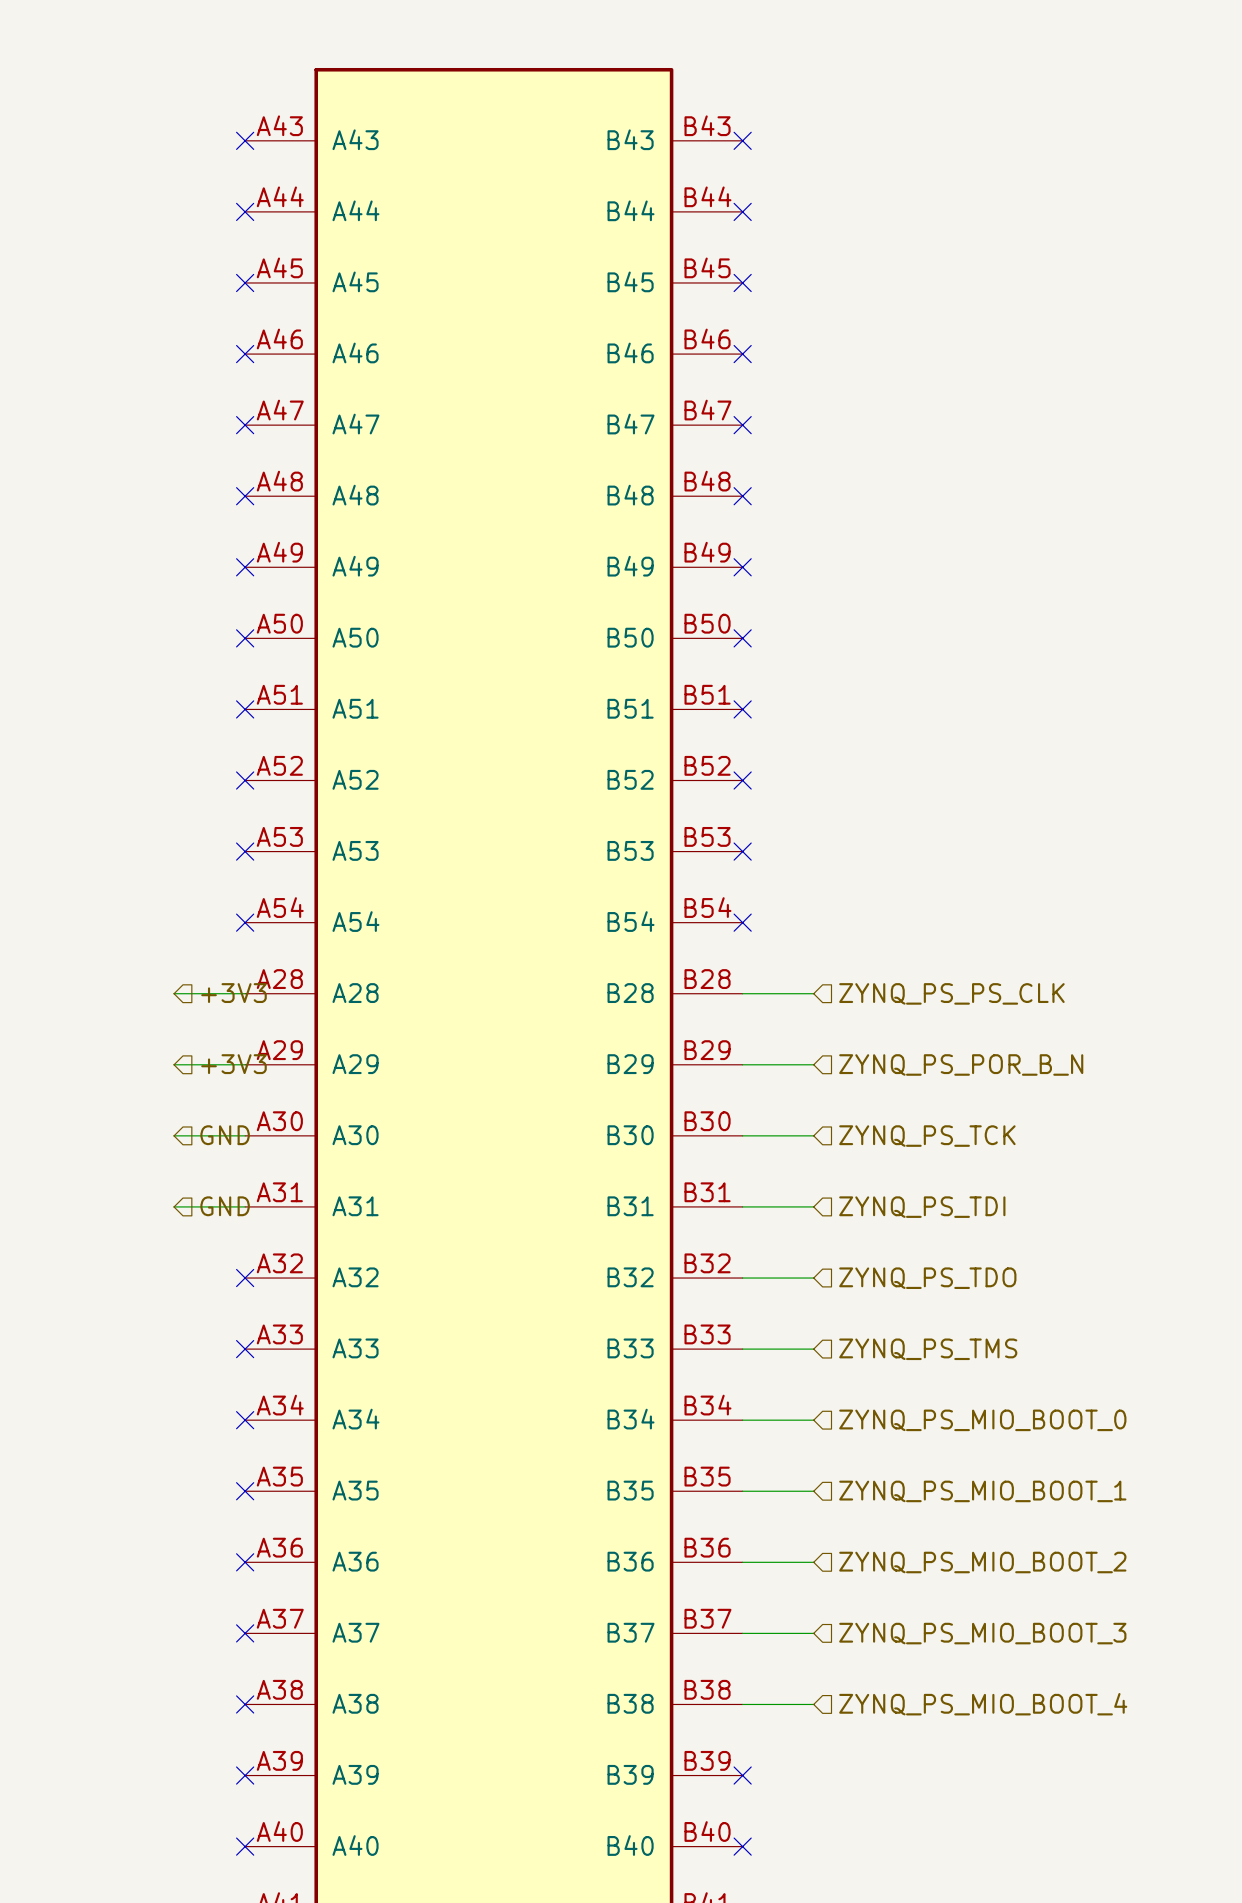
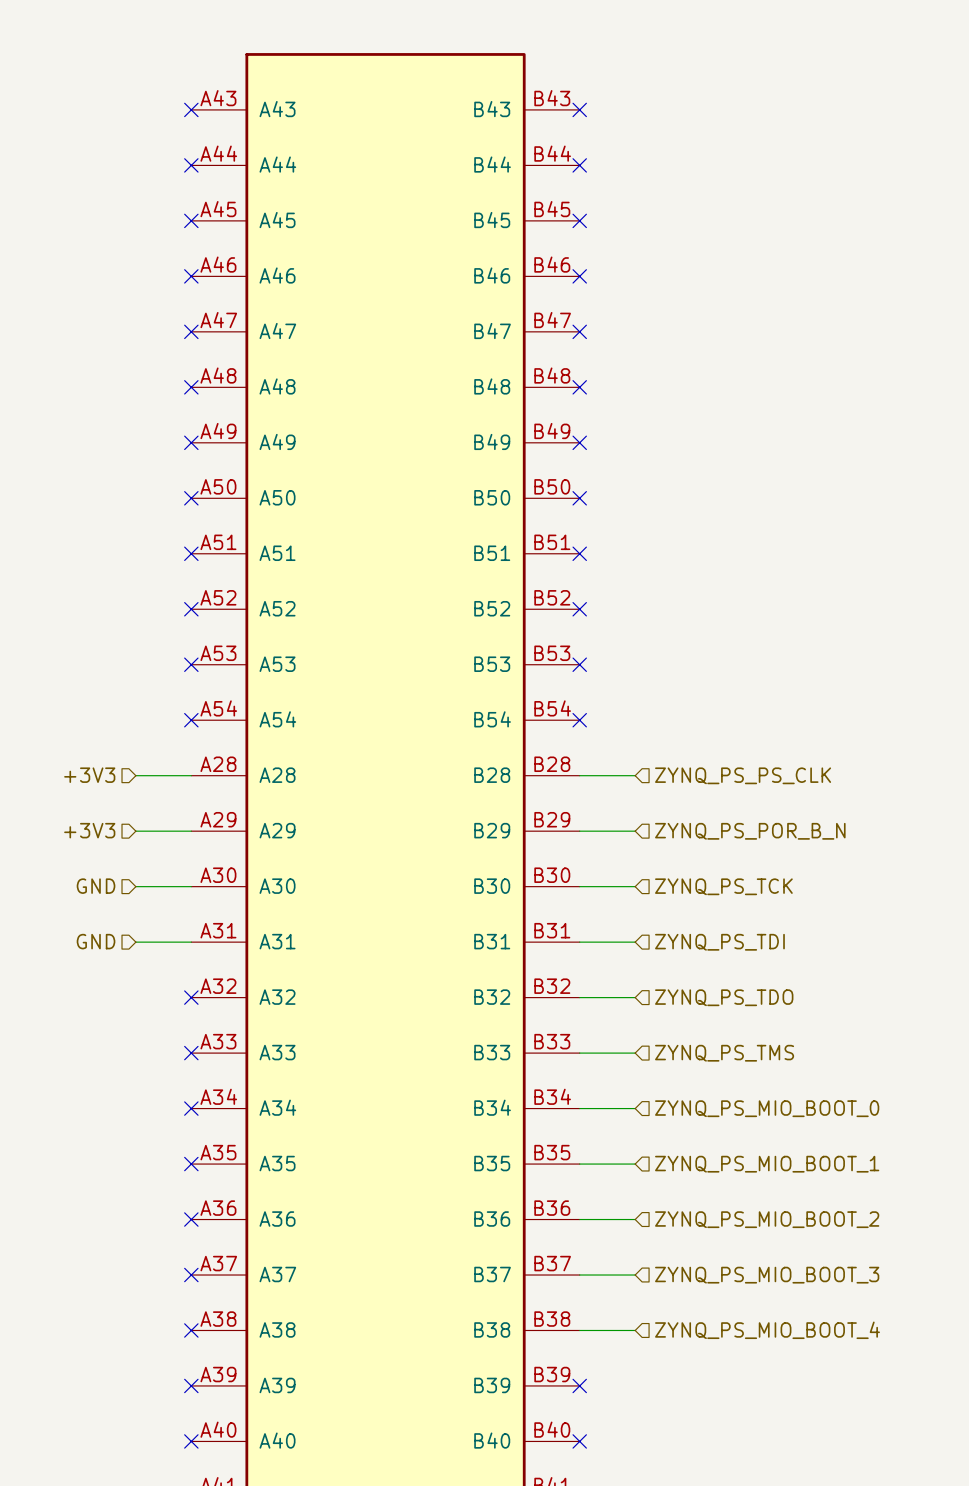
hierarchical label: none -> +3V3 (89, 775)
hierarchical label: +3V3 (233, 993) -> none
hierarchical label: none -> +3V3 (89, 830)
hierarchical label: +3V3 (233, 1064) -> none
hierarchical label: none -> GND (96, 886)
hierarchical label: GND (225, 1135) -> none
hierarchical label: none -> GND (96, 941)
hierarchical label: GND (225, 1206) -> none

